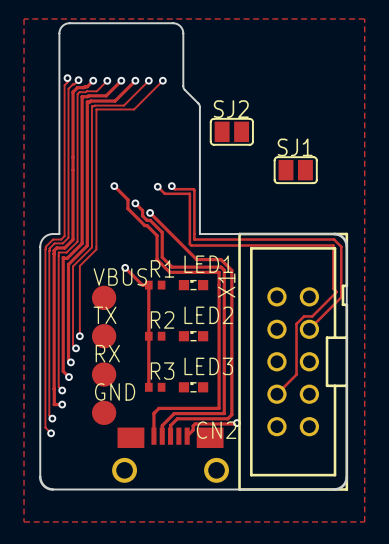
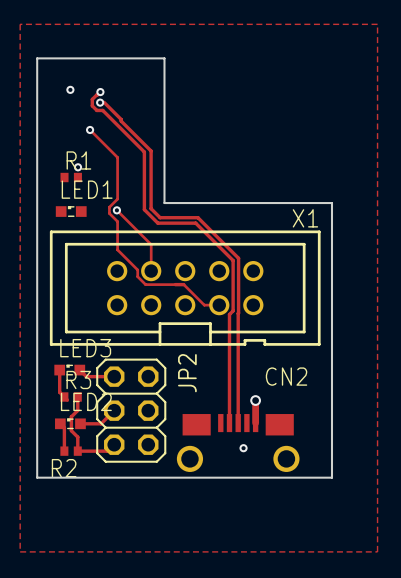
track: (67, 78) (67, 82) (64, 85) (64, 236) (61, 239) (53, 239) (45, 246) -> none
via: (67, 78) -> none
track: (78, 80) (68, 88) (68, 237) (62, 243) (54, 243) (49, 248) -> none
via: (78, 80) -> none
track: (93, 80) (87, 86) (77, 87) (73, 92) (73, 239) (64, 247) (56, 247) (54, 250) -> none
via: (93, 80) -> none
track: (107, 80) (96, 91) (79, 92) (77, 94) (77, 241) (66, 252) (58, 252) (58, 255) -> none
via: (107, 80) -> none
track: (121, 80) (106, 95) (82, 96) (82, 243) (67, 258) (63, 257) (63, 371) -> (59, 370) (61, 393)
via: (121, 80) -> none
track: (135, 80) (115, 101) (87, 101) (87, 245) (68, 264) (68, 359) (70, 362) -> none
via: (135, 80) -> none
track: (148, 80) (123, 105) (91, 106) (91, 247) (73, 266) (73, 345) (76, 348) -> none
via: (148, 80) -> none
track: (162, 80) (134, 109) (96, 109) (96, 249) (79, 265) (79, 336) -> none
via: (162, 80) -> none
via: none -> (70, 89)
track: none -> (99, 92) (92, 99) (92, 105) (96, 110) (102, 110) (144, 152) (144, 209) (157, 223) (195, 223) (233, 260) (233, 310) (229, 314) (229, 423)
via: none -> (100, 92)
via: none -> (100, 102)
track: none -> (90, 129) (117, 157) (117, 199) (109, 207) (109, 213) (117, 221) (117, 249) (137, 269) (137, 276) (145, 284) (183, 284) (204, 305) (219, 305)
via: none -> (90, 129)
SJ2: (231, 131) -> none
via: none -> (78, 167)
SJ1: (295, 170) -> none
track: (114, 186) (127, 199) (127, 208) (157, 235) (157, 259) (169, 272) (219, 272) (219, 408) (158, 408) (153, 413) (153, 436) -> none
via: (114, 186) -> none
track: (157, 186) (164, 193) (189, 193) (191, 245) (333, 245) (333, 288) (336, 291) (312, 316) (304, 316) (296, 323) (296, 374) (276, 394) -> none
via: (157, 186) -> none
track: (171, 186) (174, 189) (194, 190) (194, 239) (334, 239) (341, 246) (341, 297) (309, 329) -> none
via: (171, 186) -> none
track: none -> (116, 210) (151, 244) (151, 271)
via: none -> (116, 210)
track: (135, 203) (142, 210) (142, 216) (147, 220) (150, 220) (162, 232) (162, 257) (171, 267) -> none
via: (135, 203) -> none
track: (150, 212) (196, 259) (220, 259) (231, 270) (231, 294) -> (104, 102) (151, 151) (151, 208) (160, 217) (197, 217) (238, 258) (238, 313)
via: (150, 212) -> none
board edge: (40, 246) (41, 240) (46, 235) (59, 234) (60, 28) (69, 23) (178, 24) (183, 32) (183, 87) (199, 106) (199, 234) (334, 234) (341, 236) (345, 241) (346, 478) (341, 486) (334, 489) (51, 489) (45, 486) (40, 480) (40, 451) -> (37, 263) (37, 58) (164, 58) (164, 203) (331, 203) (331, 477) (37, 477)
track: (45, 246) (45, 427) (51, 433) -> none
track: (49, 248) (49, 415) (52, 418) -> none
track: (58, 255) (58, 386) (62, 390) -> none
track: (125, 267) (142, 285) (148, 285) (148, 387) -> none
via: (125, 267) -> none
track: (180, 267) (221, 267) (224, 270) (224, 413) (174, 413) (162, 425) (162, 436) -> none
R1 position: (155, 285) -> (71, 177)
LED1 position: (193, 285) -> (71, 211)
X1 name position: X1 (226, 285) -> X1 (305, 218)
VBUS: (104, 297) -> none
R2 name position: R2 (162, 319) -> R2 (64, 468)
via: (79, 336) -> none
TX: (104, 336) -> none
R2 position: (155, 336) -> (71, 451)
LED2 position: (193, 336) -> (70, 423)
via: (76, 348) -> none
track: none -> (79, 370) (86, 376) (114, 376)
X1 rotation: 0° (293, 361) -> 90° clockwise (185, 288)
via: (70, 362) -> none
track: none -> (77, 397) (77, 410) (71, 416) (71, 430) (77, 437) (77, 451) (107, 451) (114, 444)
RX: (104, 374) -> none
via: (68, 377) -> none
track: none -> (255, 400) (255, 423)
via: none -> (255, 400)
track: none -> (114, 410) (101, 423) (80, 423)
JP2: none -> (131, 410)
R3 position: (155, 387) -> (71, 397)
LED3 position: (193, 387) -> (69, 370)
track: (54, 389) (54, 404) (62, 404) -> none
via: (62, 390) -> none
track: none -> (60, 423) (64, 427) (64, 451)
track: (231, 399) (231, 414) (227, 418) (177, 418) (170, 425) (170, 436) -> none
via: (62, 404) -> none
GND: (104, 412) -> none
via: (52, 418) -> none
track: (236, 423) (195, 423) (193, 430) (187, 436) -> none
CN2 name position: CN2 (216, 430) -> CN2 (286, 376)
via: (51, 433) -> none
CN2 position: (170, 455) -> (238, 443)

